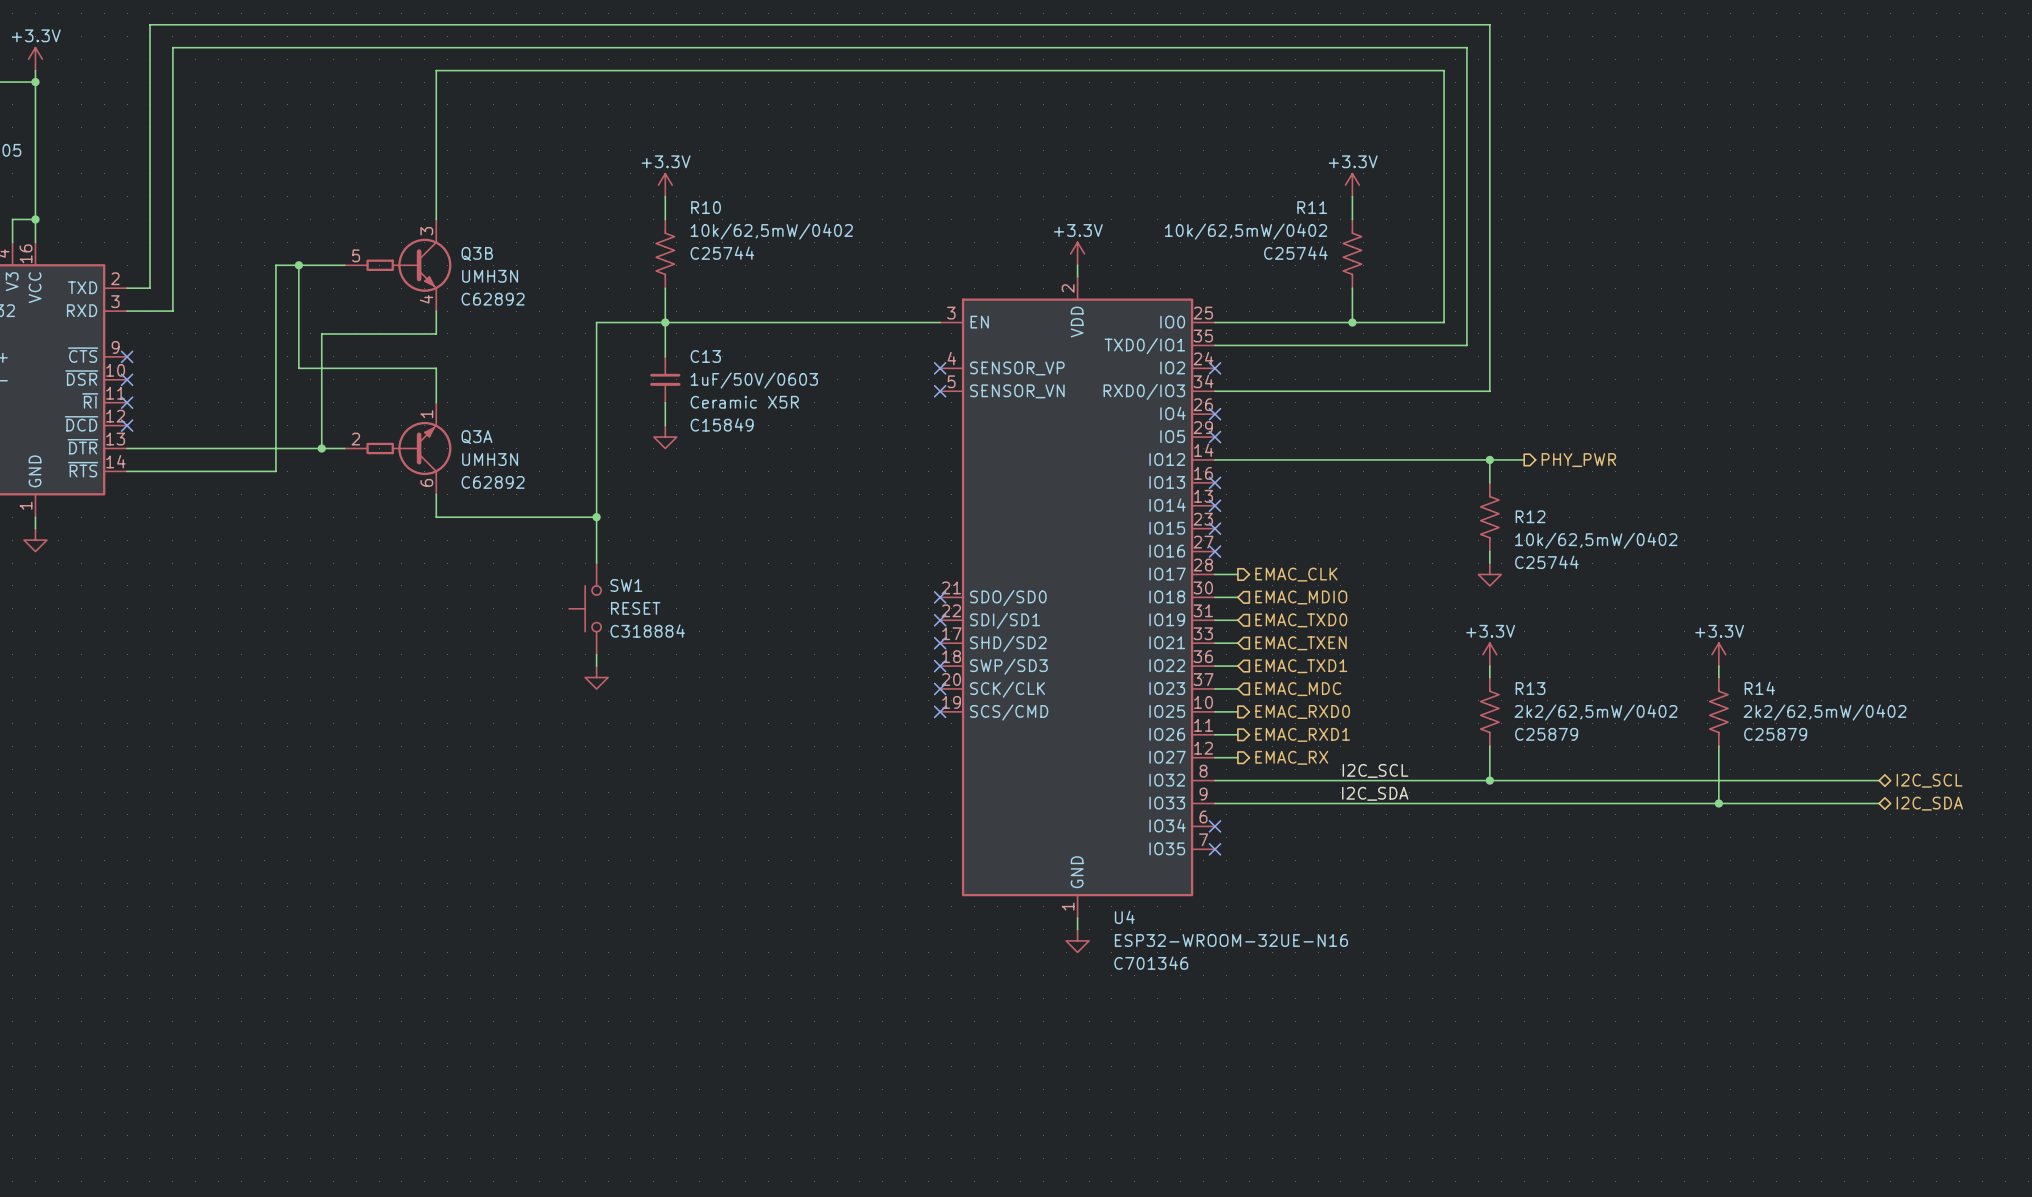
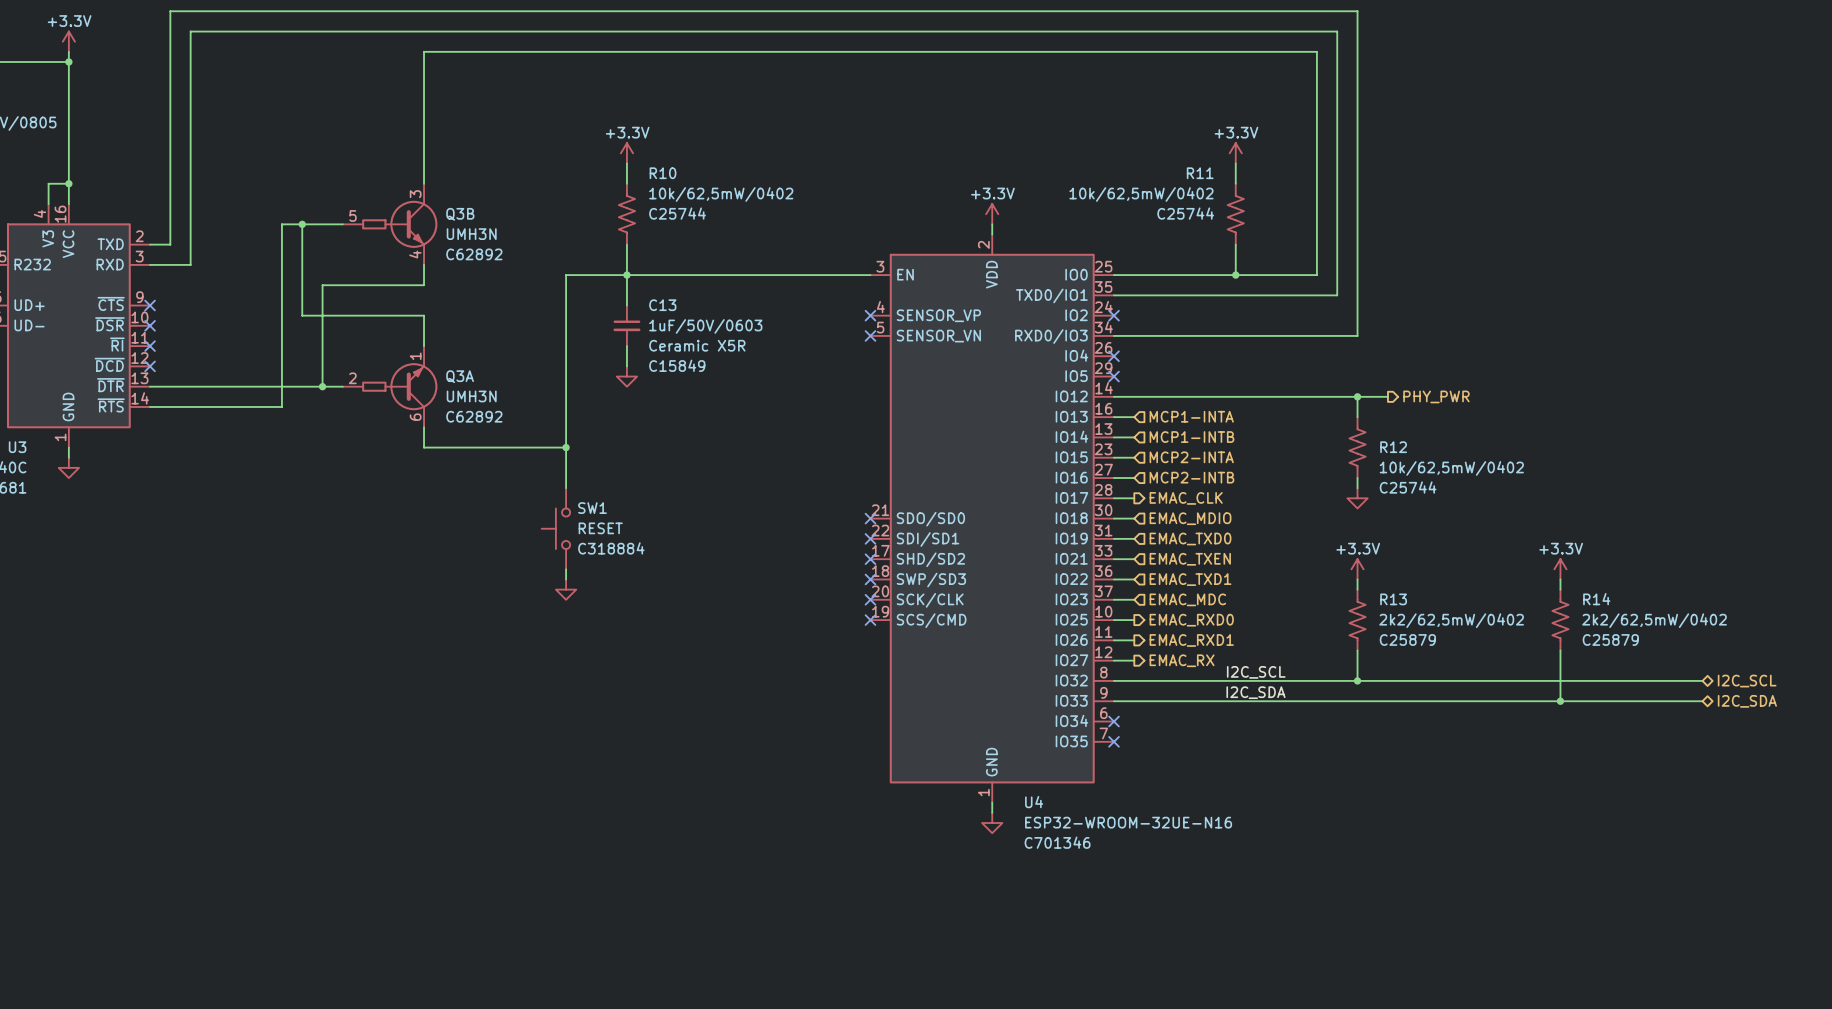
wire: none -> (1114, 417) (1134, 417)
no-connect mark: (1214, 482) -> none
hierarchical label: none -> MCP1-INTA (1191, 416)
wire: none -> (1114, 437) (1134, 437)
no-connect mark: (1214, 505) -> none
hierarchical label: none -> MCP1-INTB (1191, 437)
wire: none -> (1114, 457) (1134, 457)
no-connect mark: (1214, 528) -> none
hierarchical label: none -> MCP2-INTA (1191, 457)
wire: none -> (1114, 478) (1134, 478)
no-connect mark: (1214, 551) -> none
hierarchical label: none -> MCP2-INTB (1191, 477)

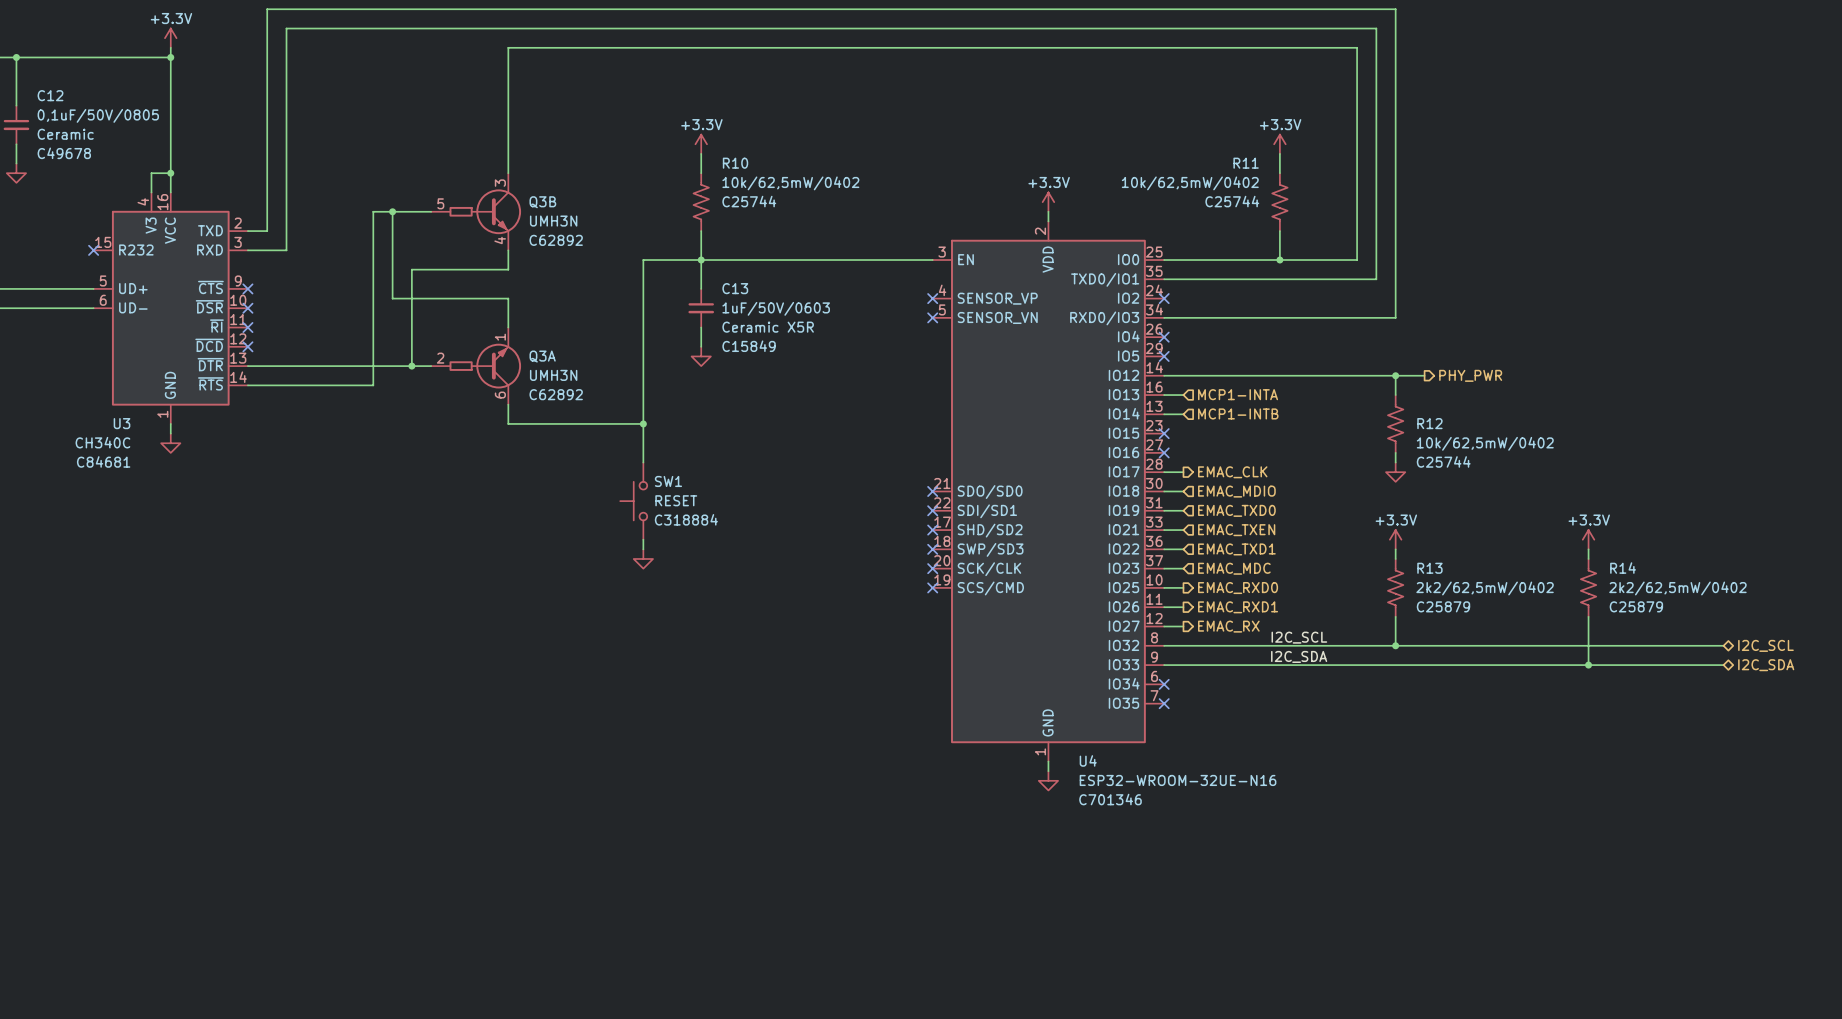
wire: (1114, 457) (1134, 457) -> none
no-connect mark: none -> (1164, 433)
hierarchical label: MCP2-INTA (1191, 457) -> none
hierarchical label: MCP2-INTB (1191, 477) -> none
wire: (1114, 478) (1134, 478) -> none
no-connect mark: none -> (1164, 452)

